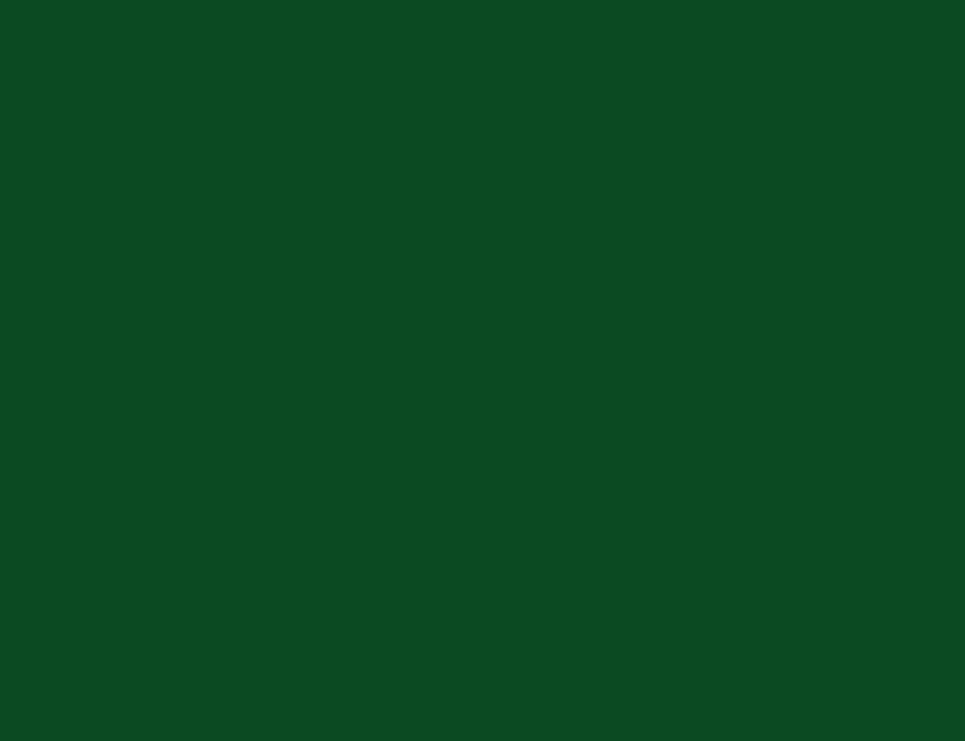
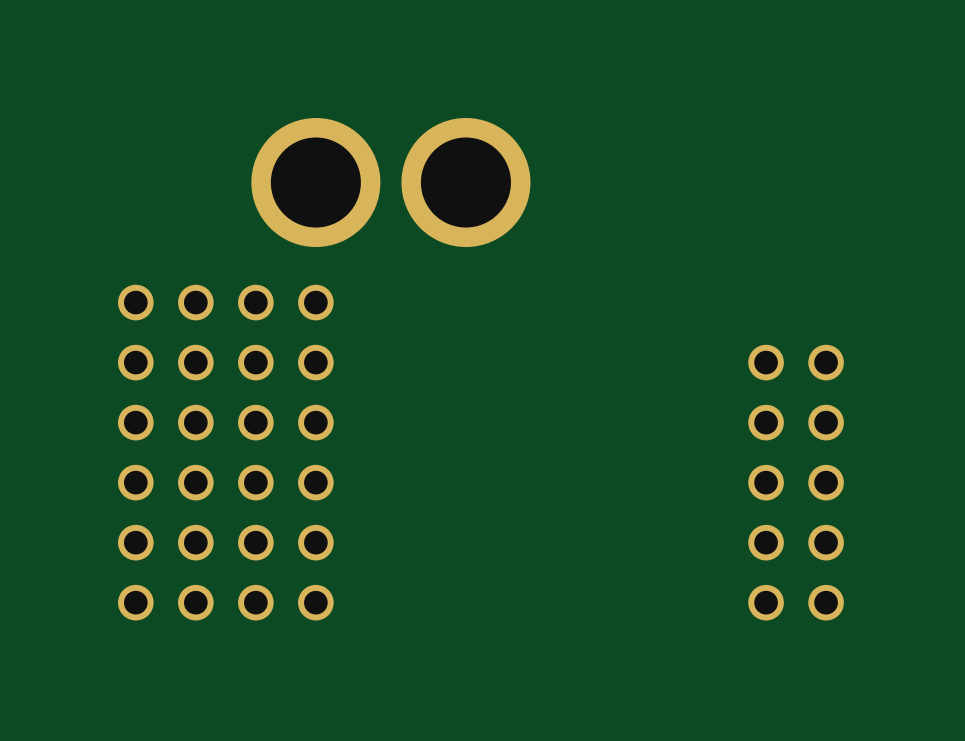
part: none -> (315, 182)
part: none -> (465, 182)
part: none -> (165, 452)
part: none -> (285, 452)
part: none -> (796, 482)

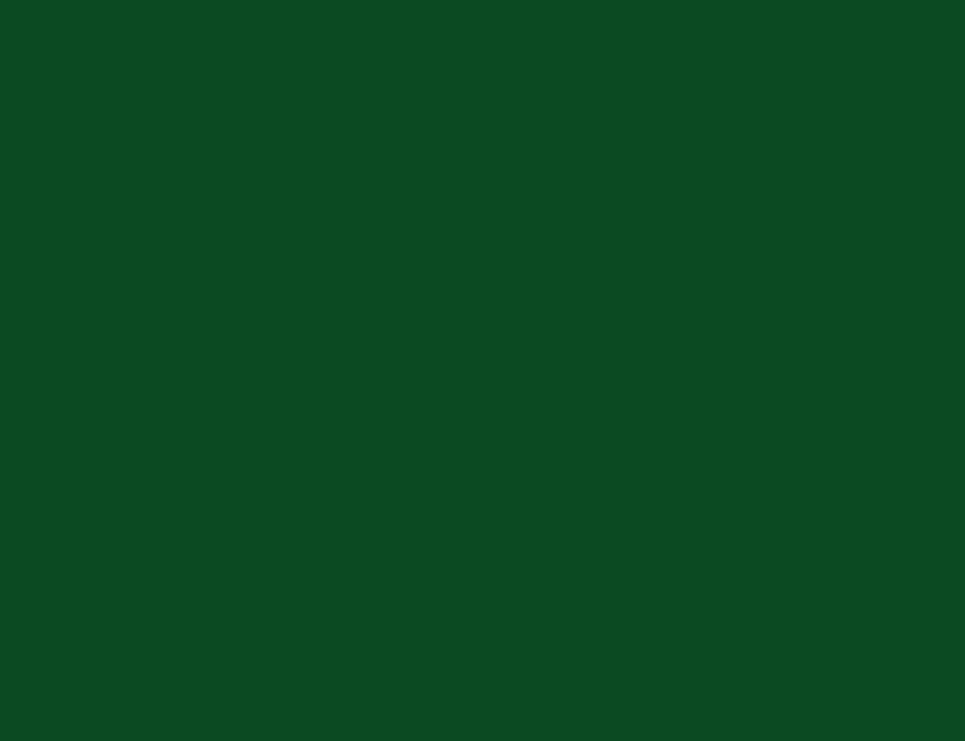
part: (315, 182) -> none
part: (465, 182) -> none
part: (165, 452) -> none
part: (285, 452) -> none
part: (796, 482) -> none

